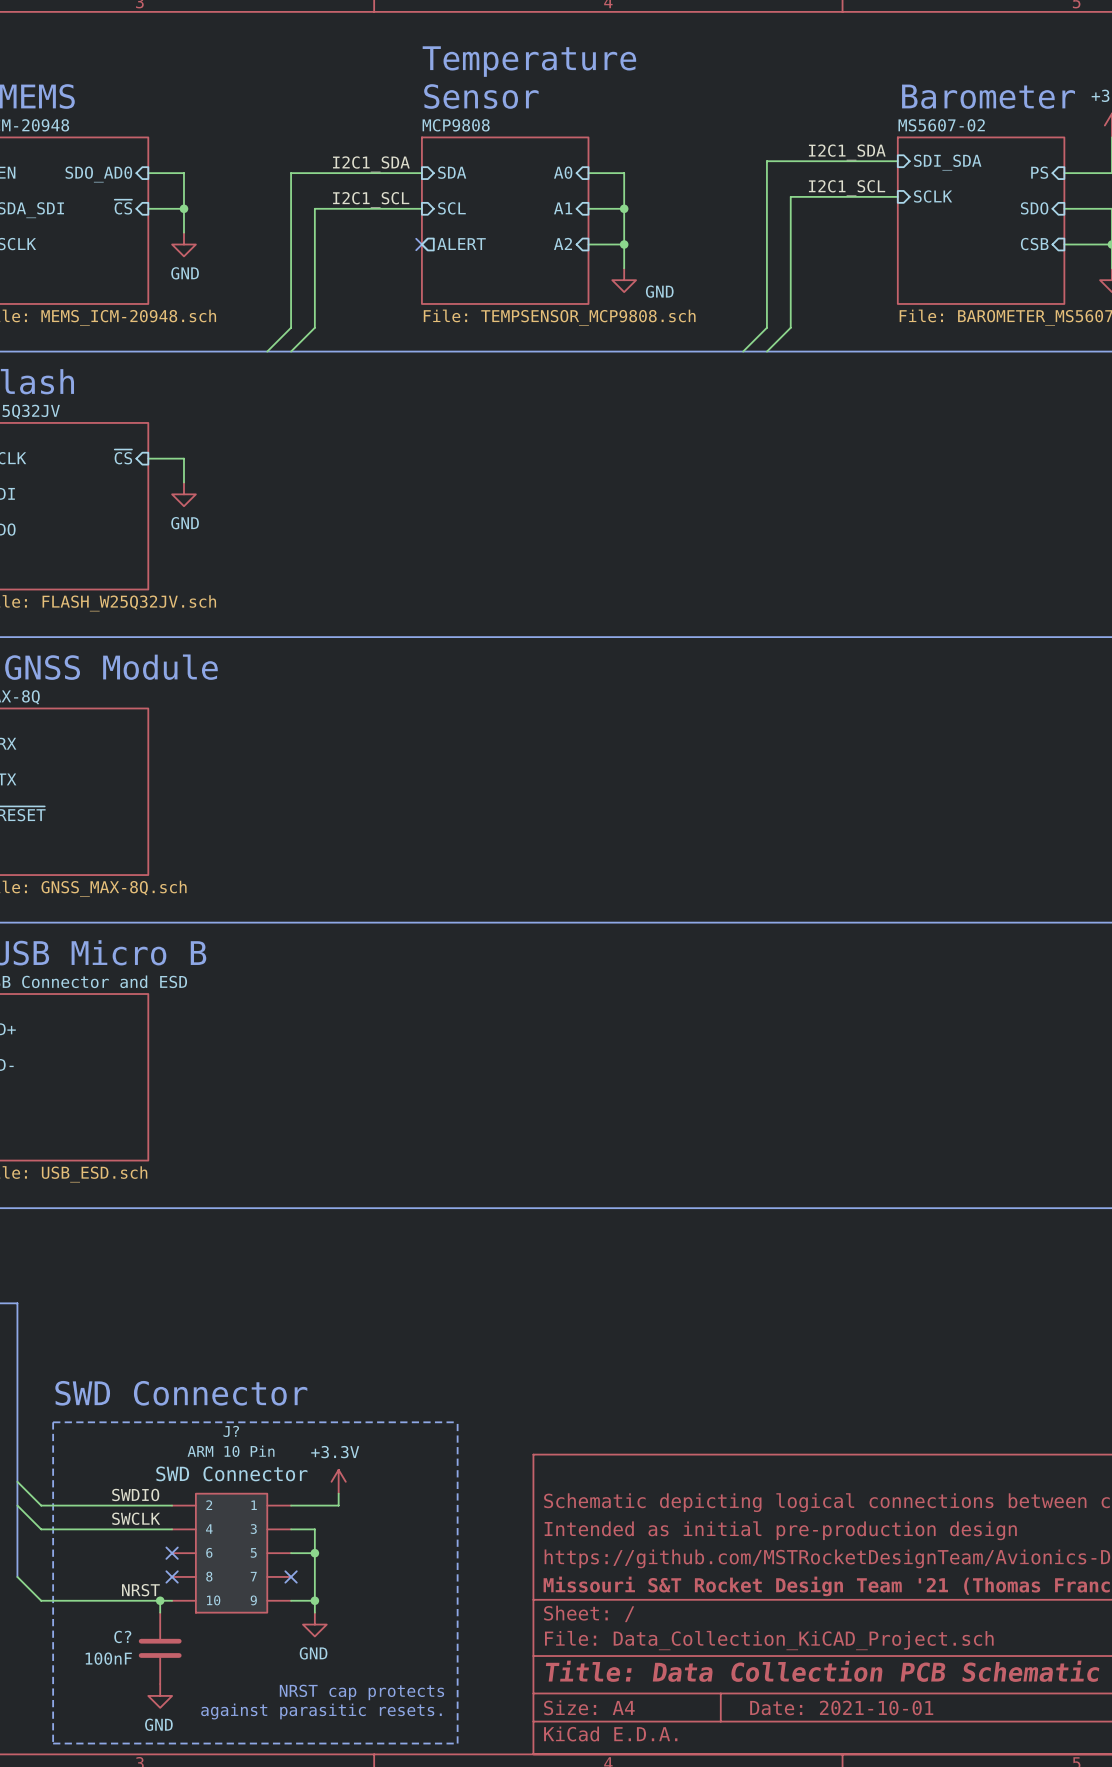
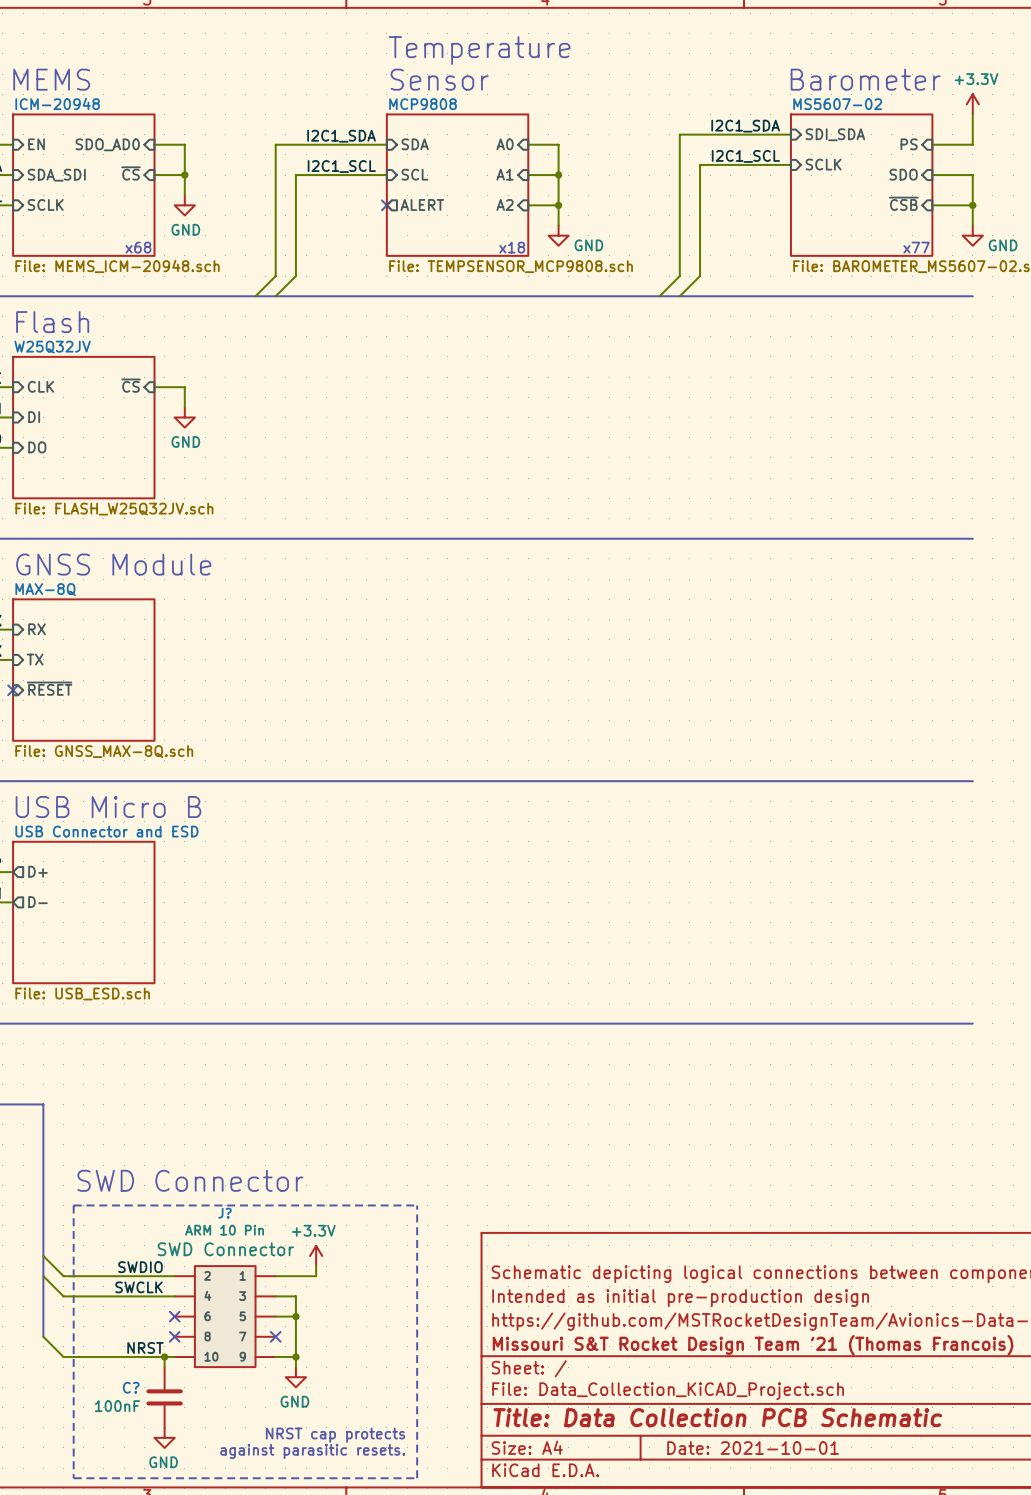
sheet pin: CSB (1034, 244) -> ~{CSB} (903, 203)
text: none -> x68 (138, 247)
text: none -> x18 (512, 247)
text: none -> x77 (916, 247)

